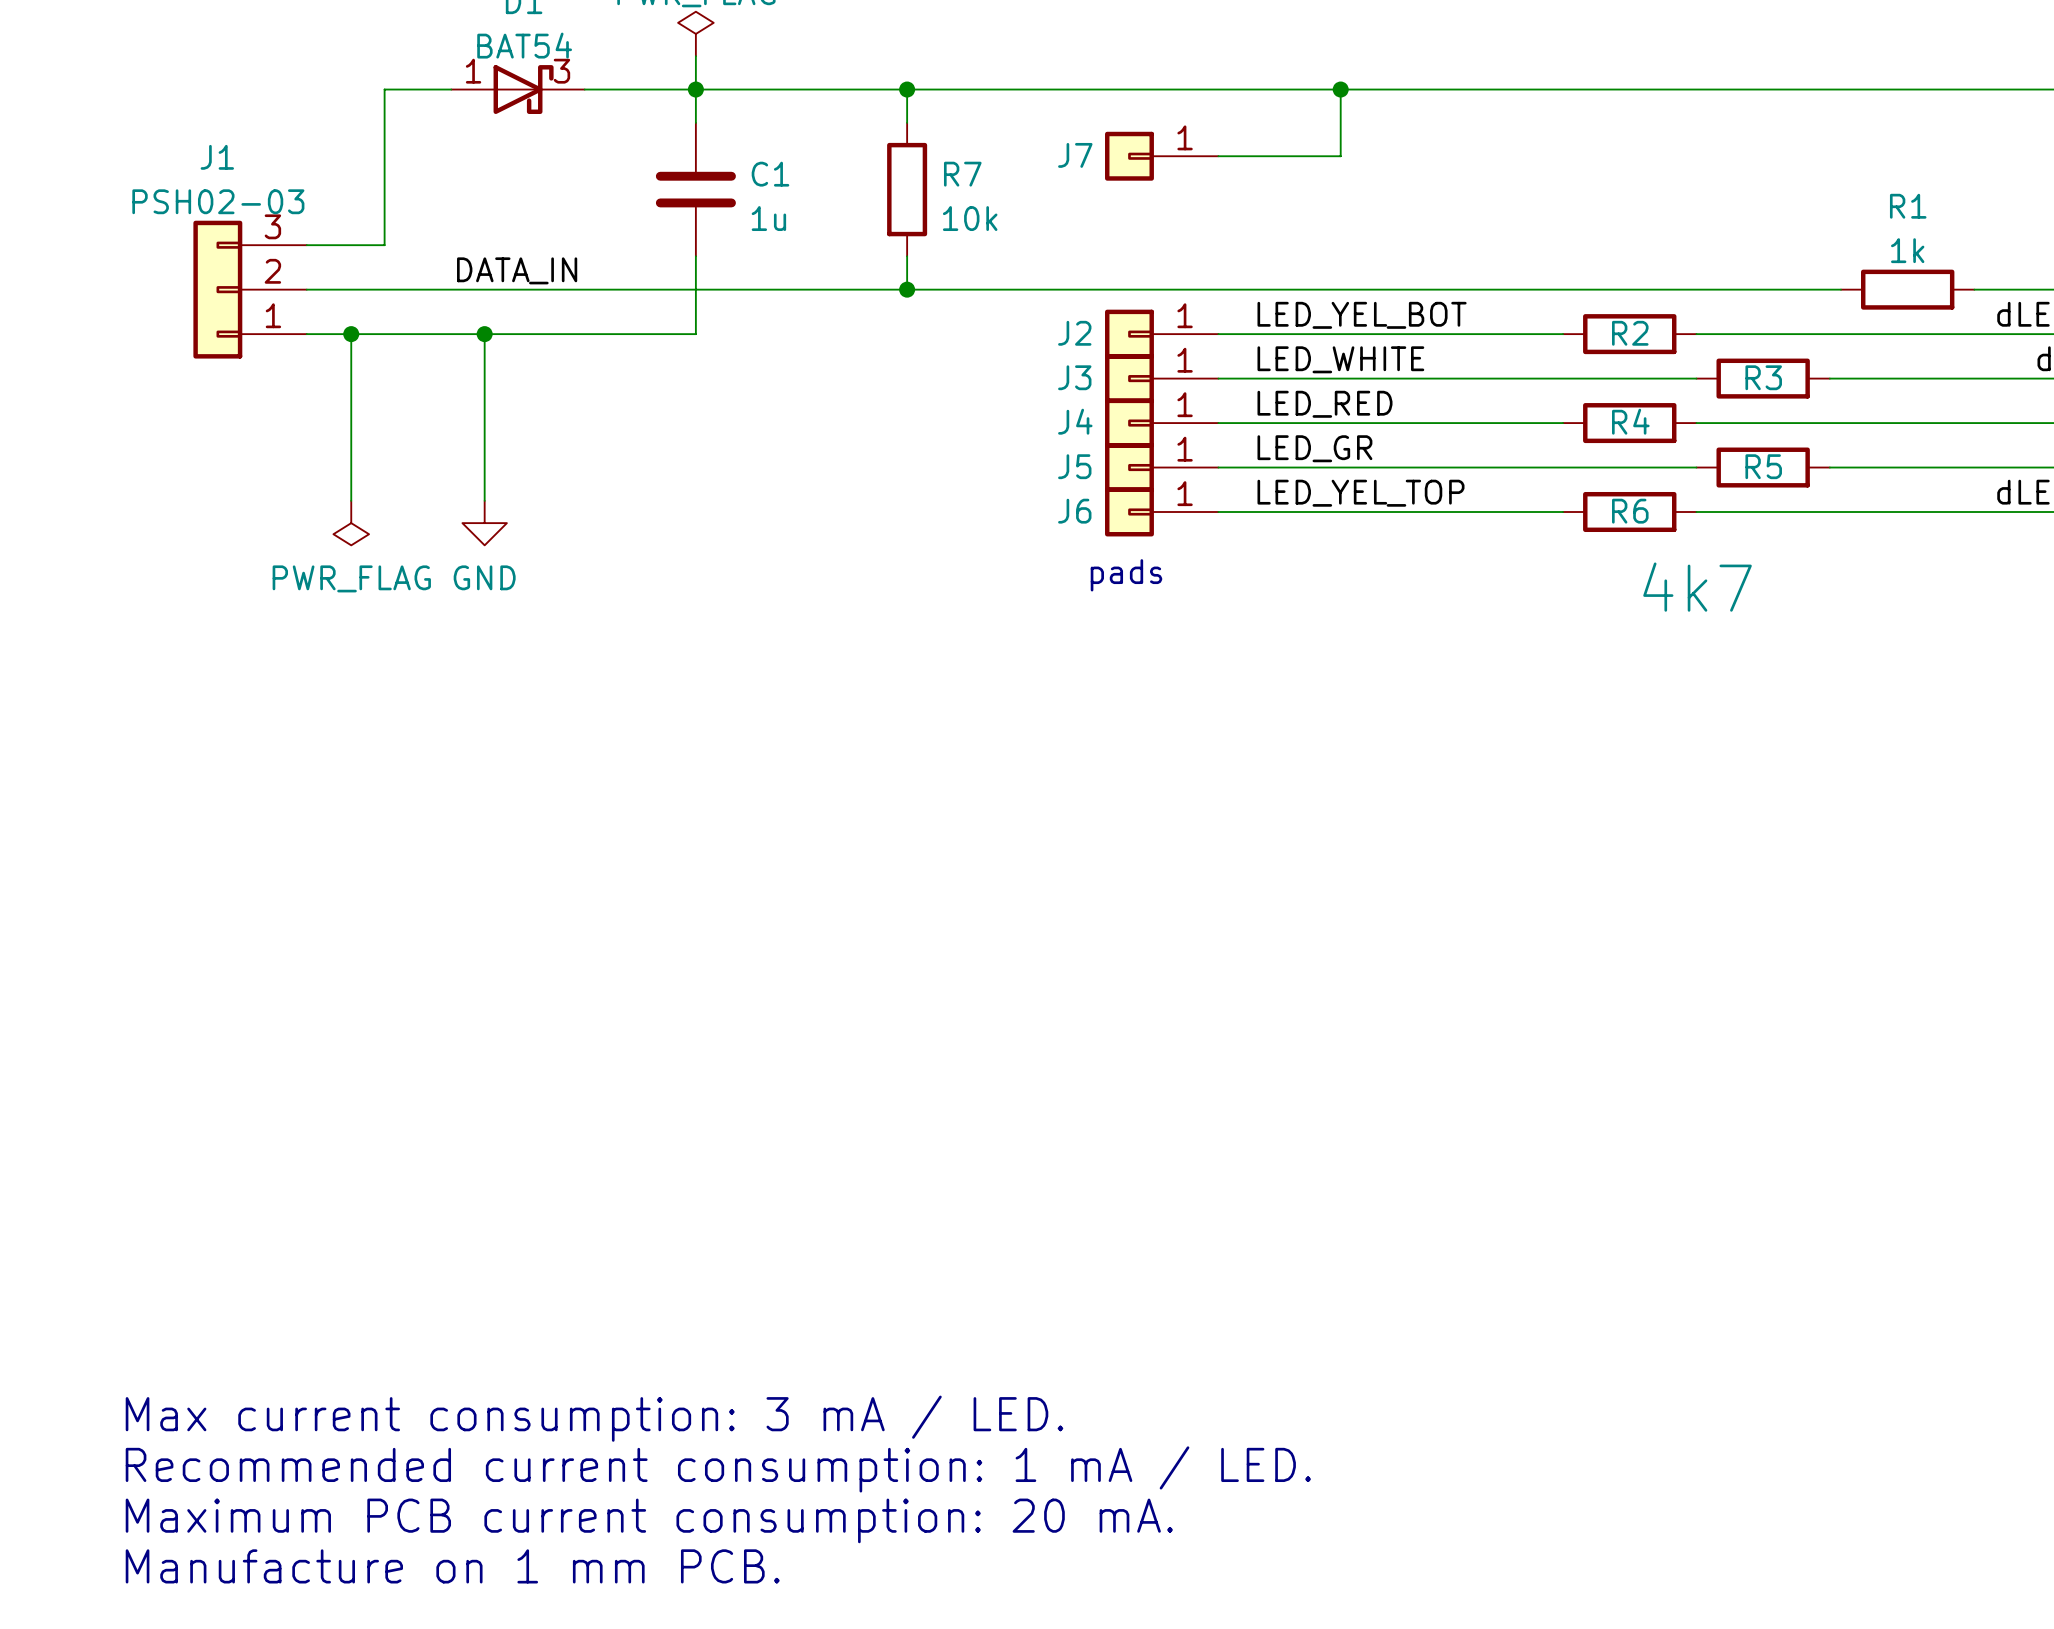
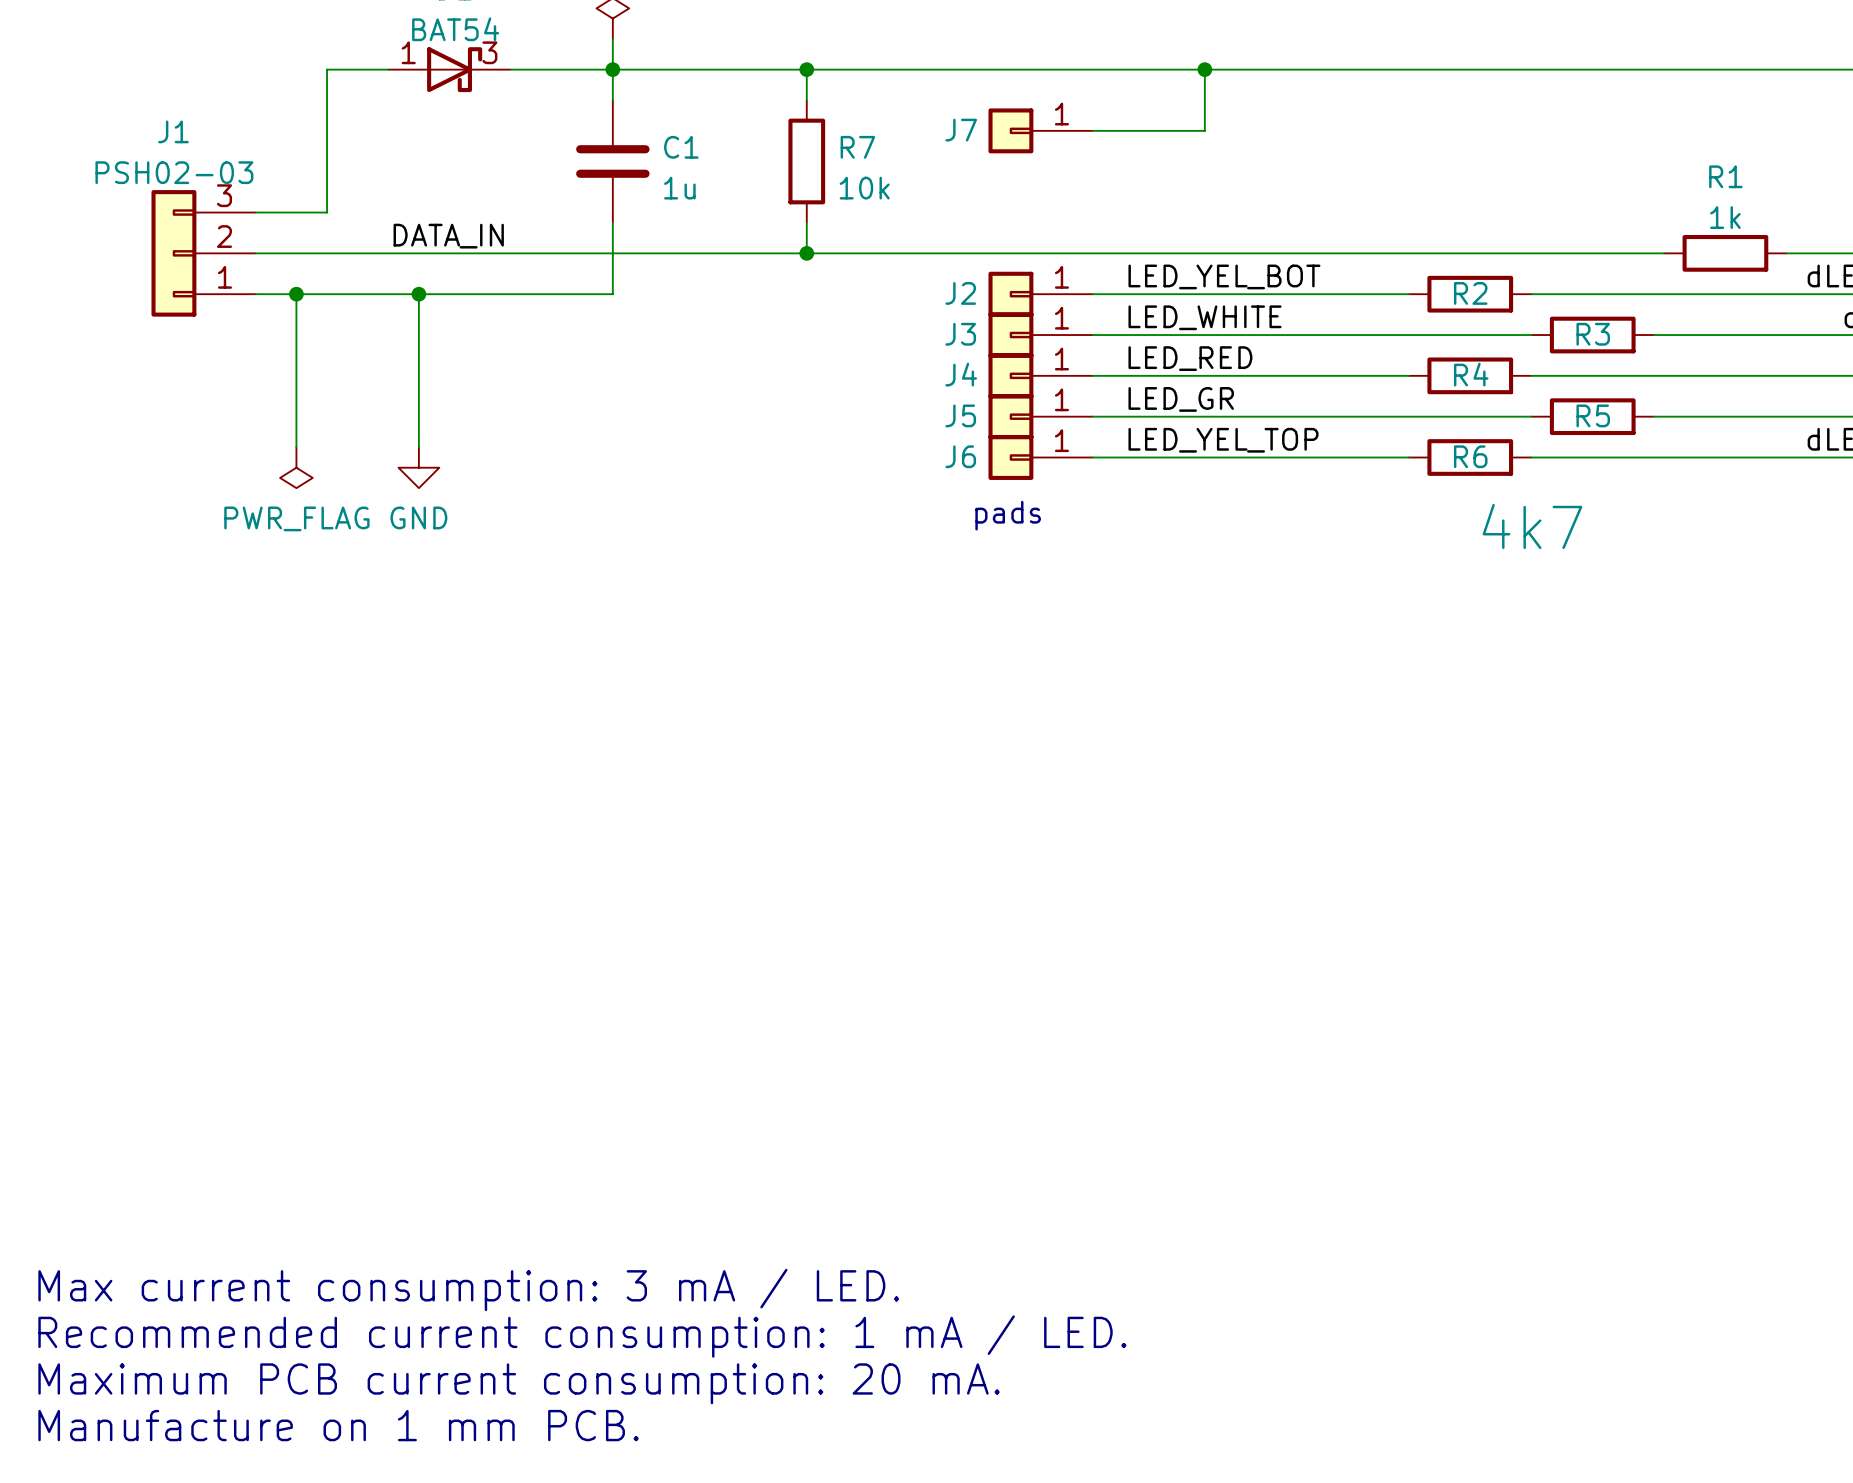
text position: Max current consumption: 3 mA / LED. (594, 1418) -> Max current consumption: 3 mA / LED. (468, 1289)
text position: Recommended current consumption: 1 mA / LED. (718, 1469) -> Recommended current consumption: 1 mA / LED. (582, 1336)
text position: Maximum PCB current consumption: 20 mA. (649, 1520) -> Maximum PCB current consumption: 20 mA. (519, 1383)
text position: Manufacture on 1 mm PCB. (452, 1566) -> Manufacture on 1 mm PCB. (338, 1425)

